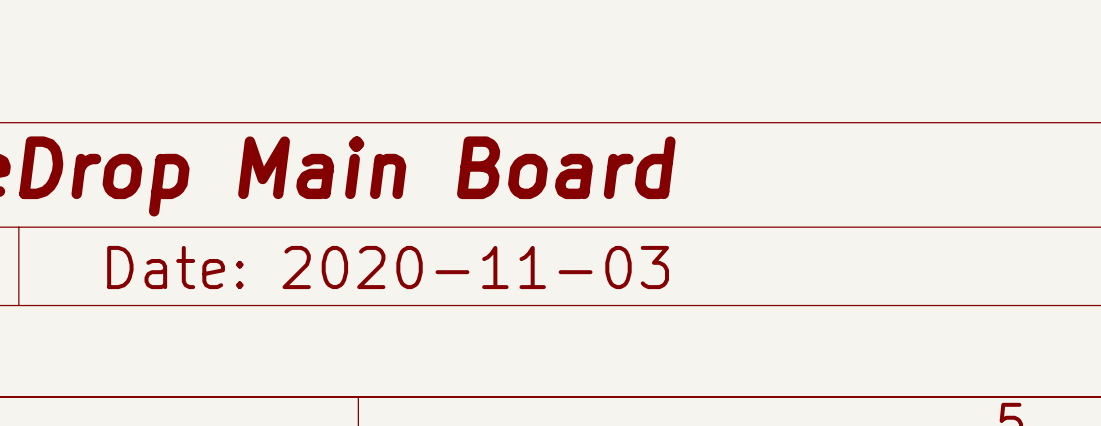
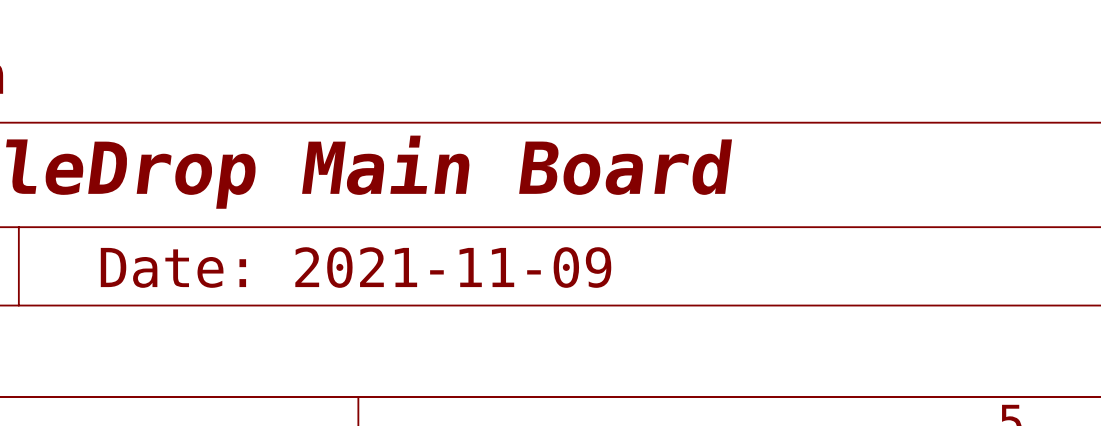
title block: Date: 2020-11-03 (388, 267) -> Date: 2021-11-09 (356, 267)

